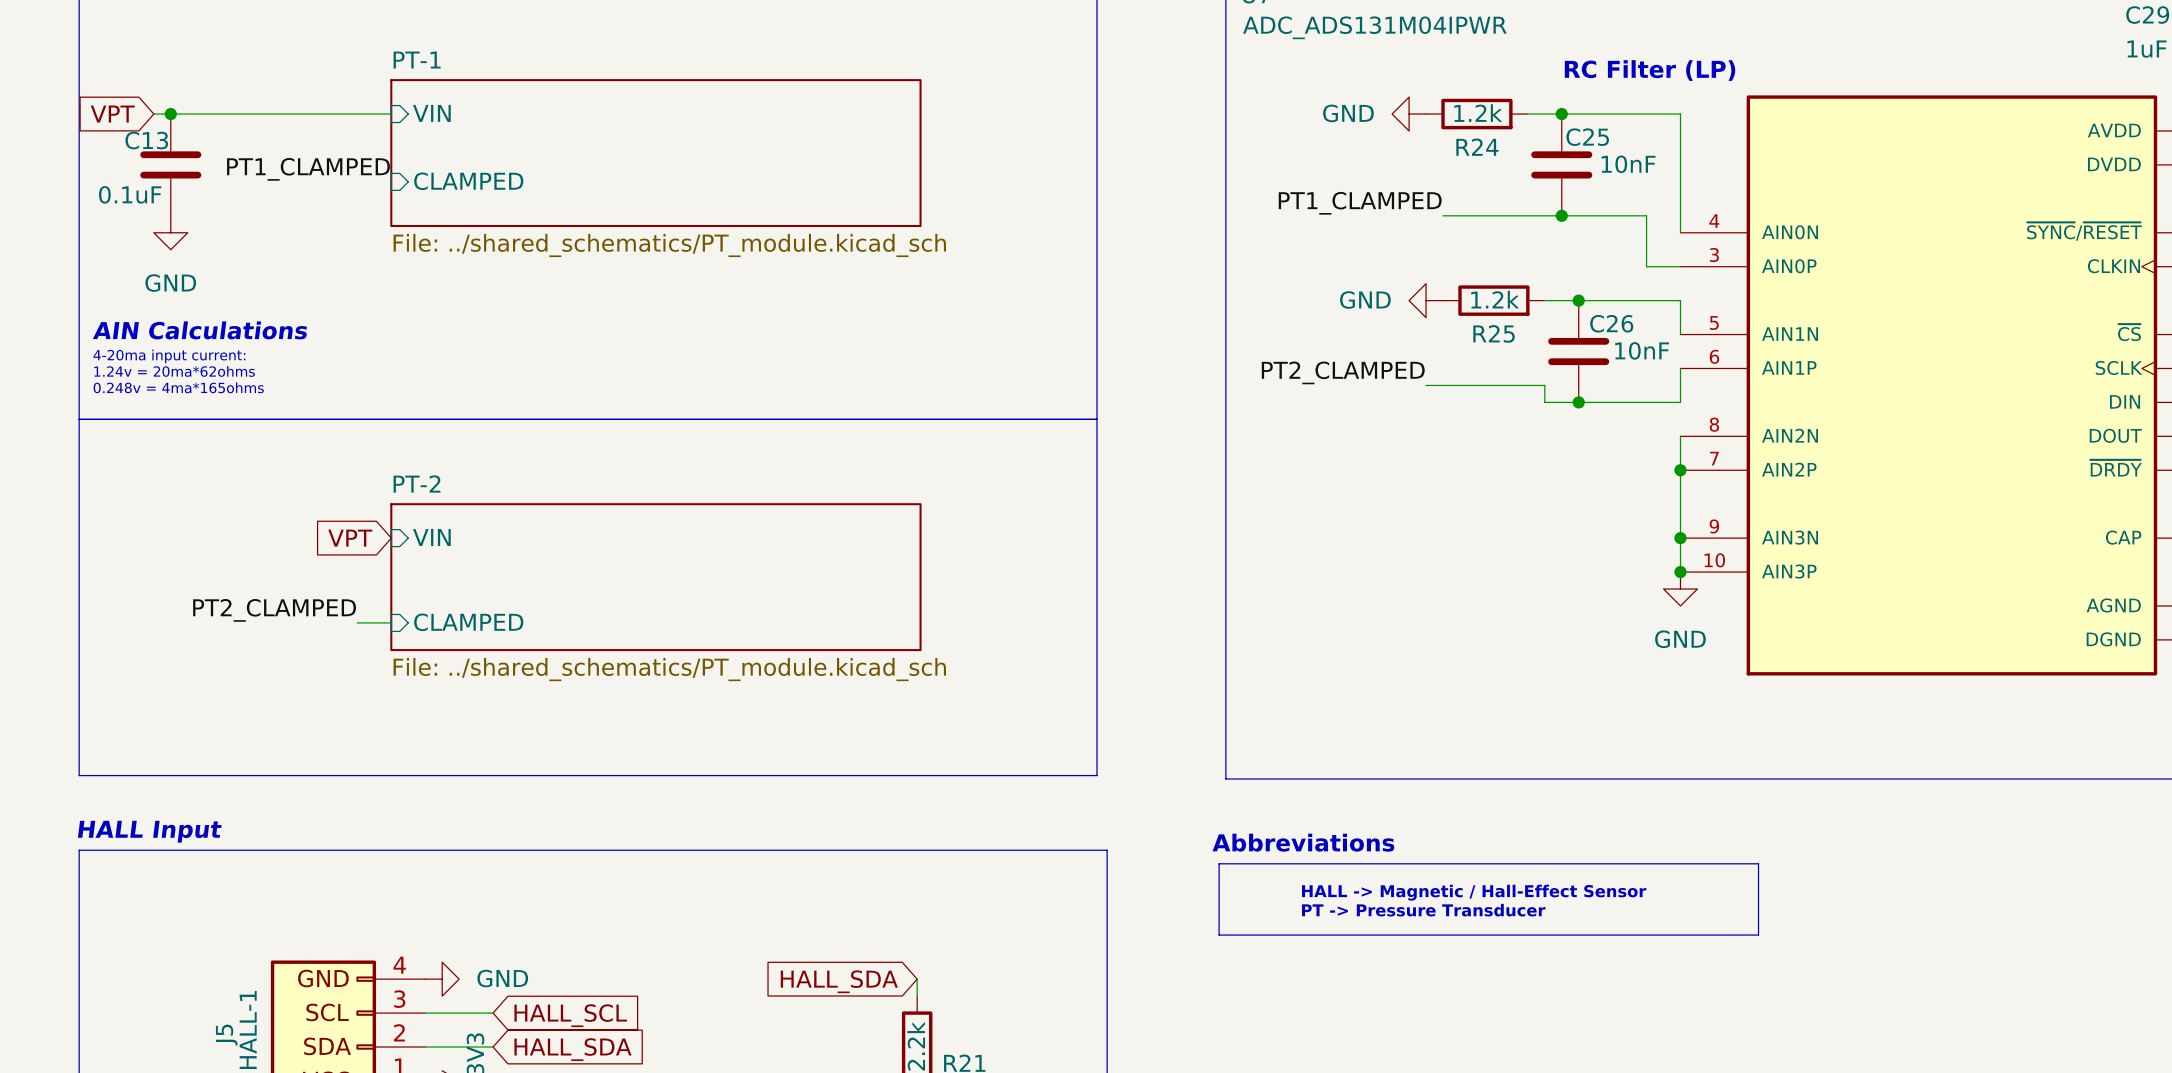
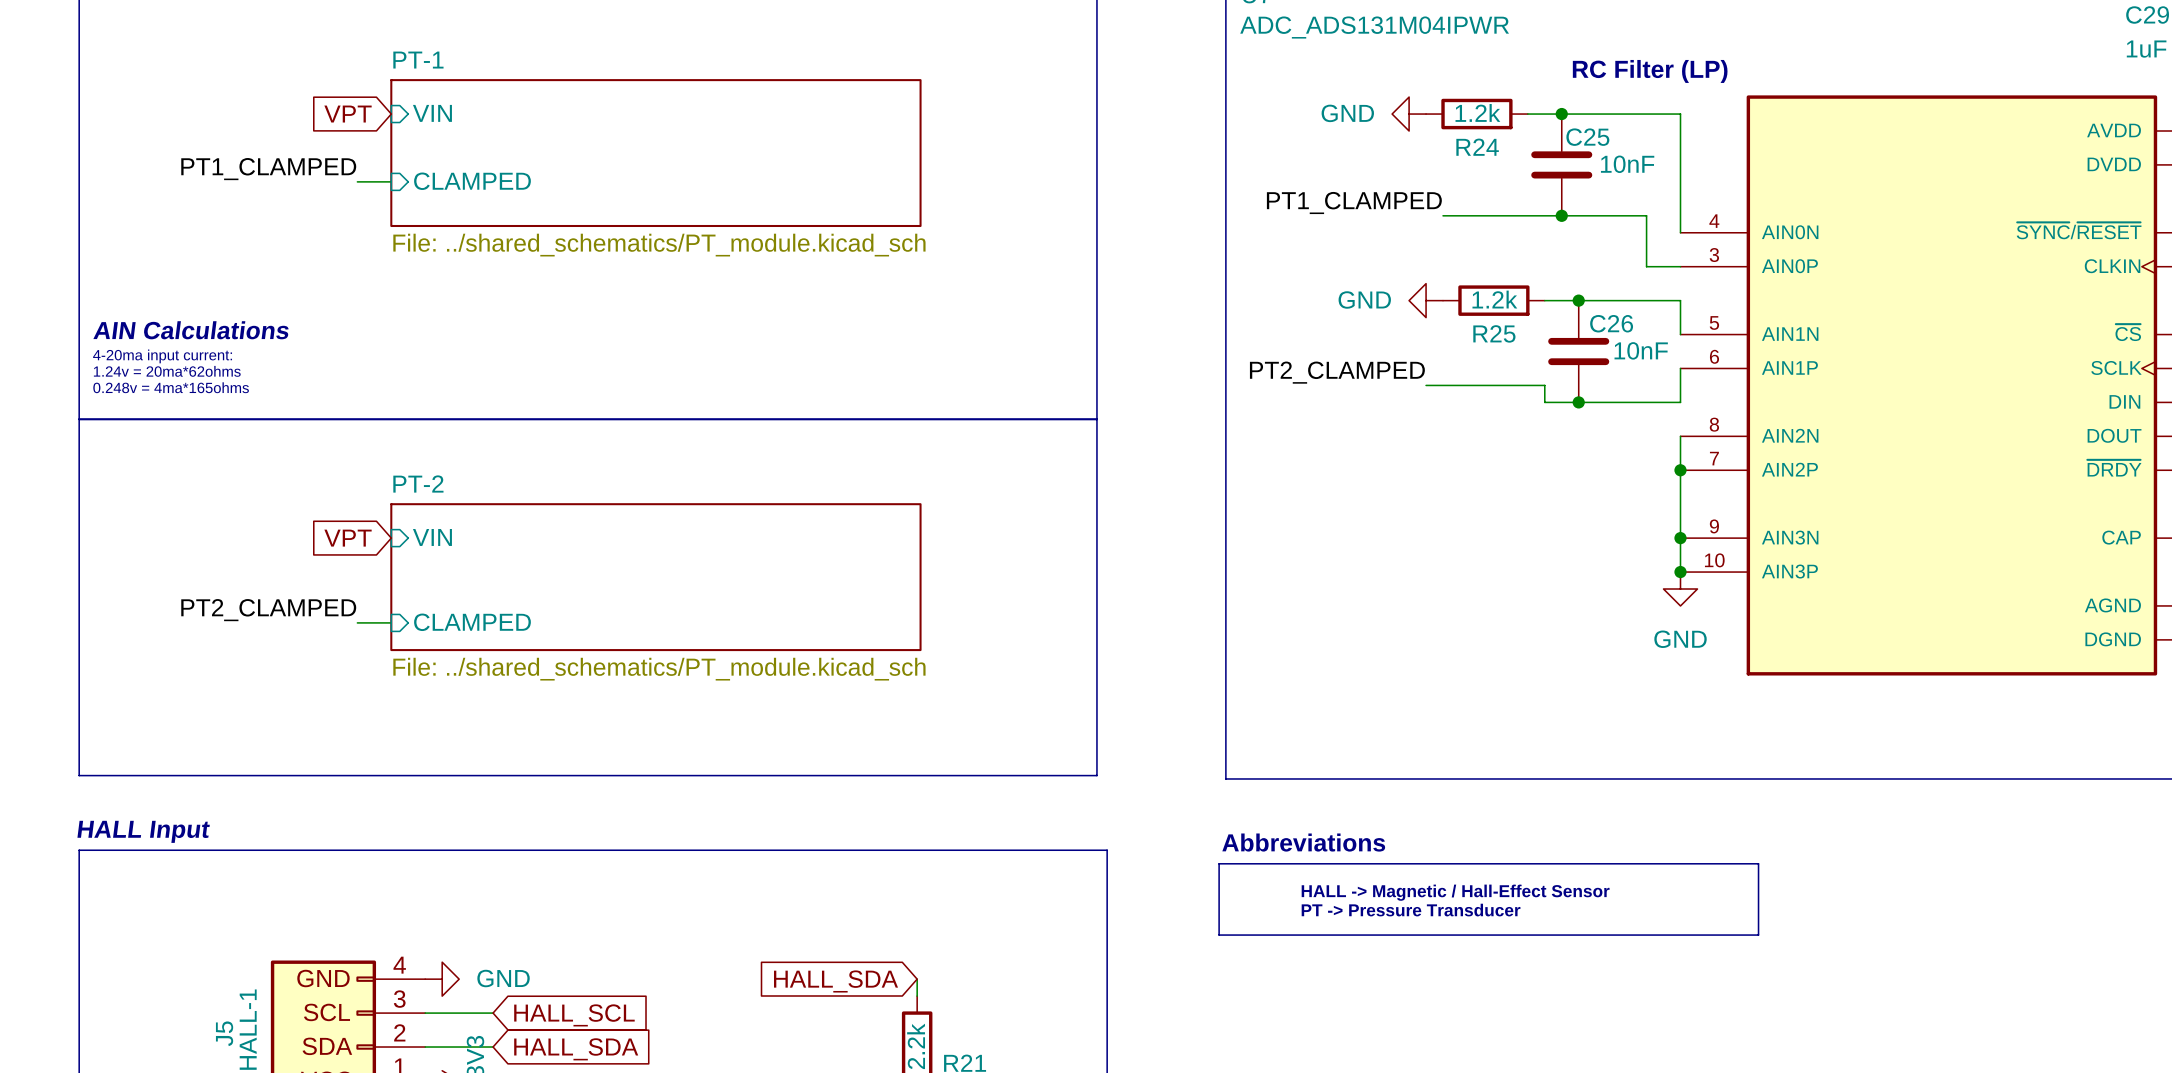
global label position: VPT (112, 114) -> VPT (348, 114)
wire: (153, 114) (391, 114) -> none
junction: (170, 114) -> none
C13: 0.1uF (170, 164) -> none
label position: PT1_CLAMPED (308, 169) -> PT1_CLAMPED (268, 169)
wire: none -> (357, 181) (391, 181)
power symbol: GND (170, 232) -> none

